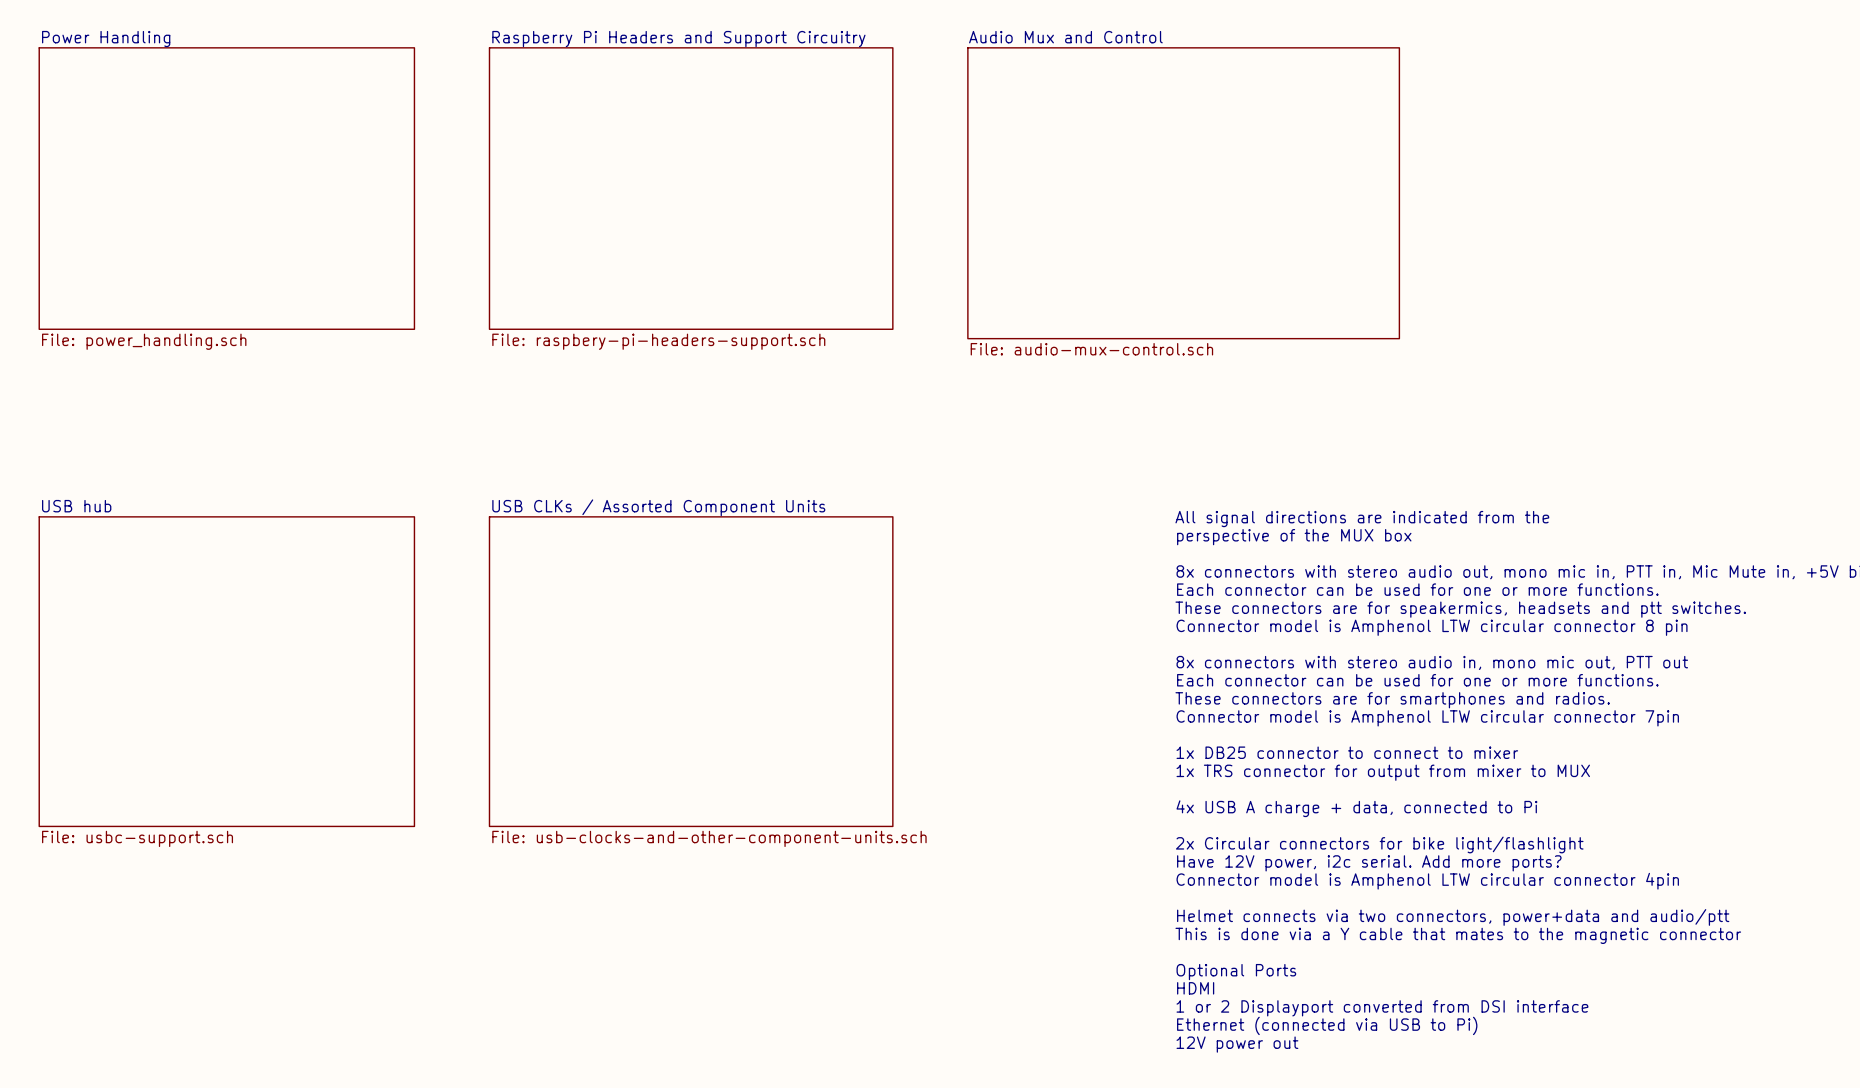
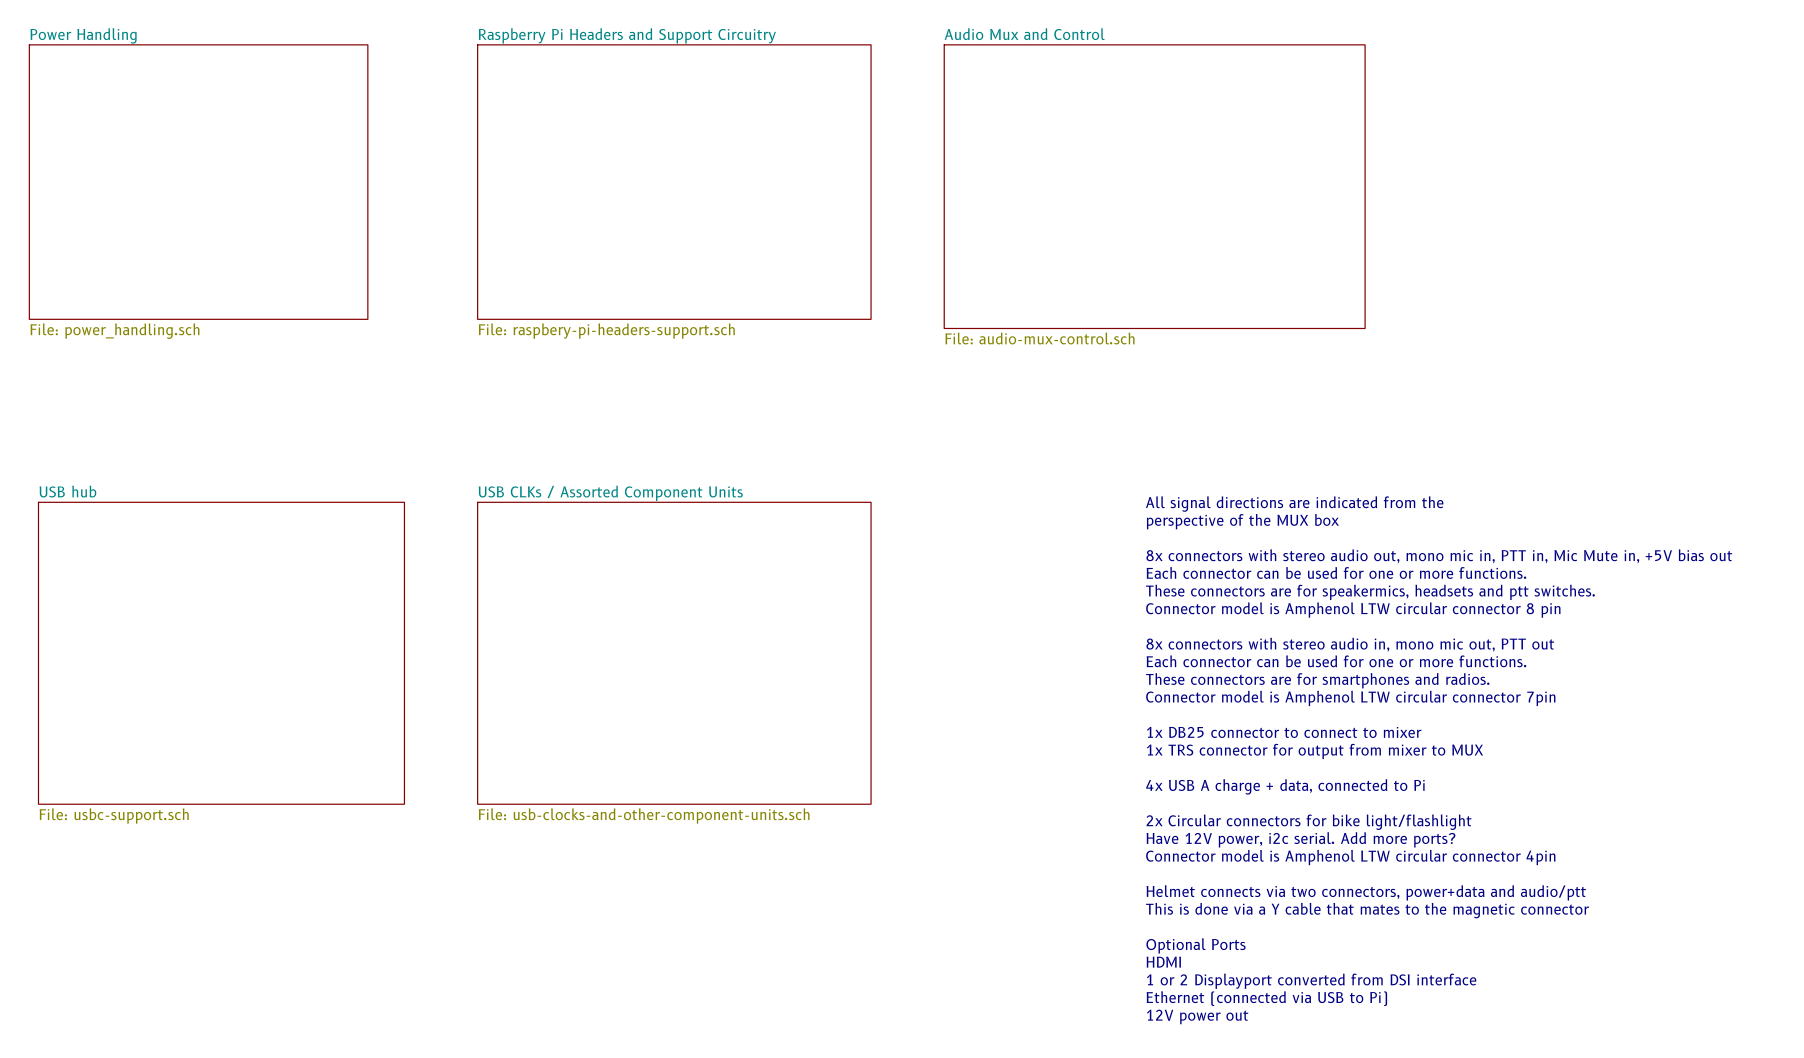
sheet Power Handling: none -> File: power_handling.sch (198, 182)
sheet Power Handling: File: power_handling.sch (226, 188) -> none

